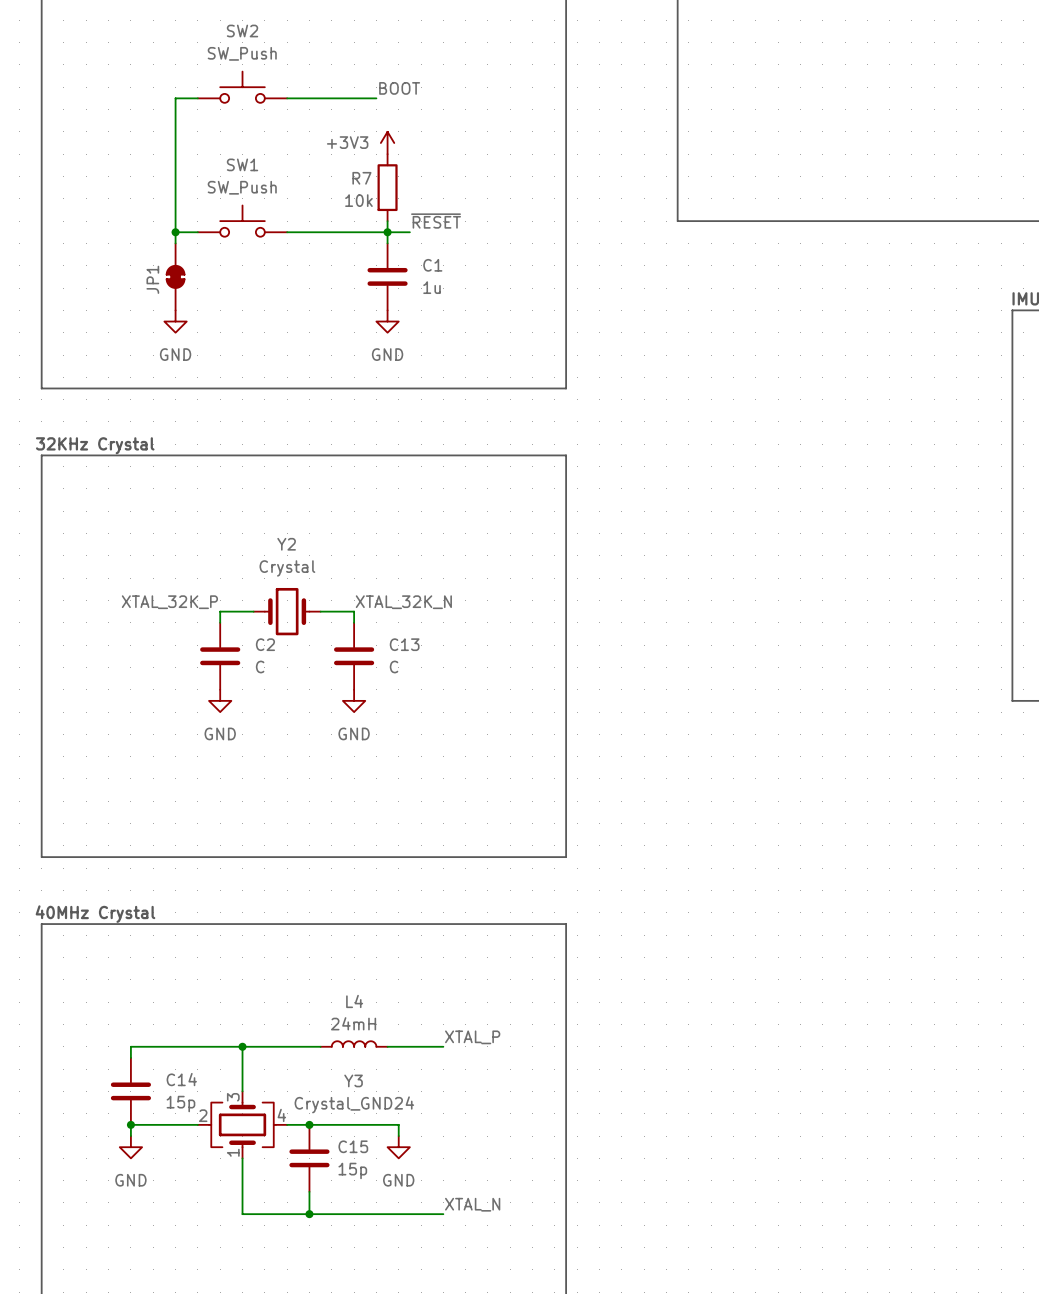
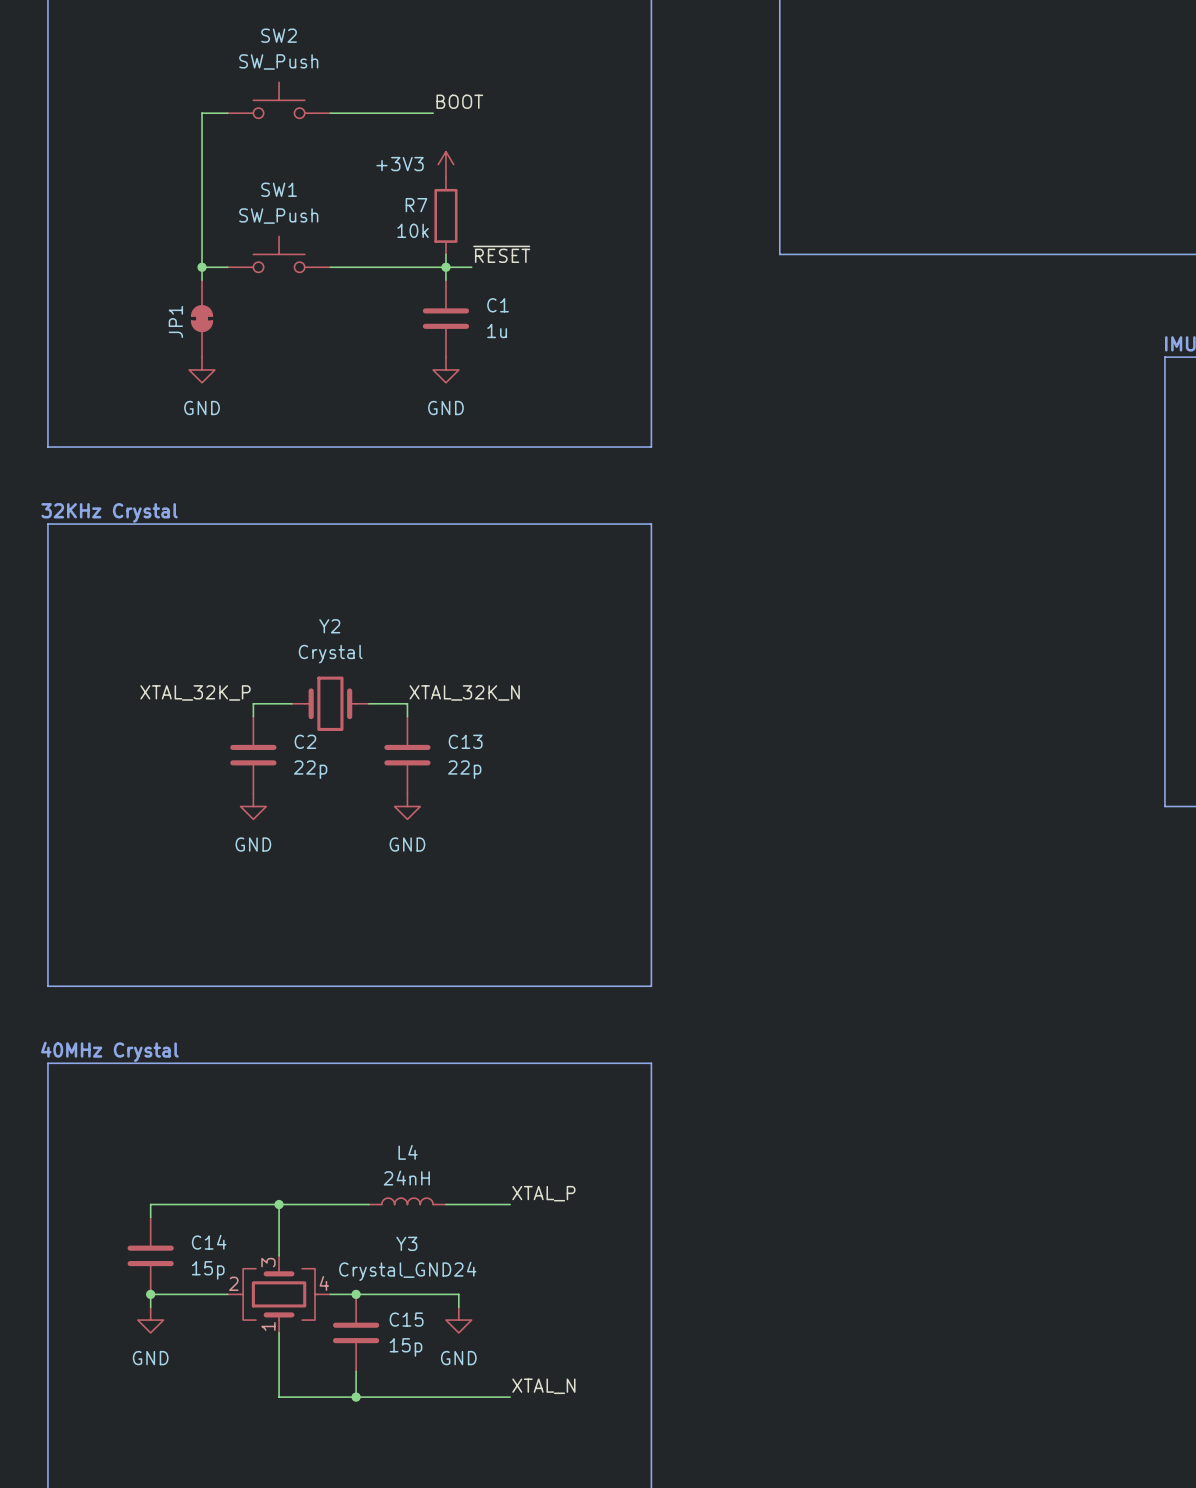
C2 value: C (260, 667) -> 22p (310, 769)
C13 value: C (394, 667) -> 22p (464, 769)
L4 value: 24mH (353, 1023) -> 24nH (406, 1178)

